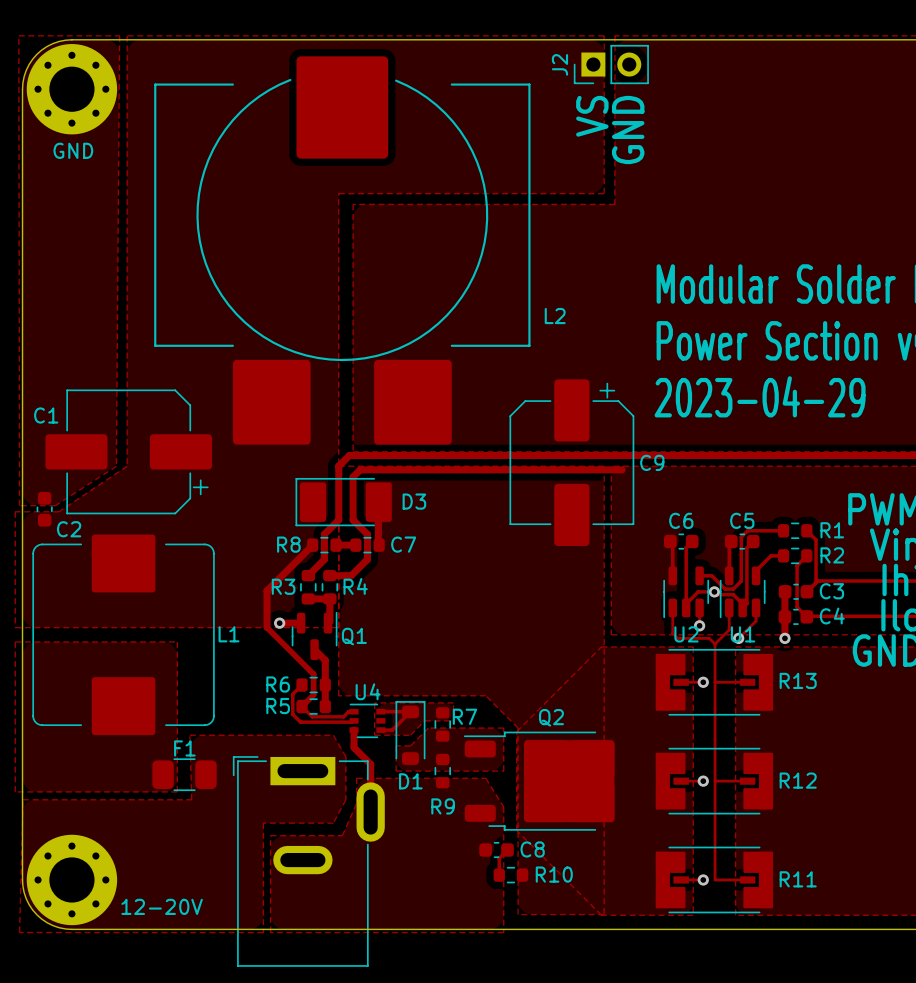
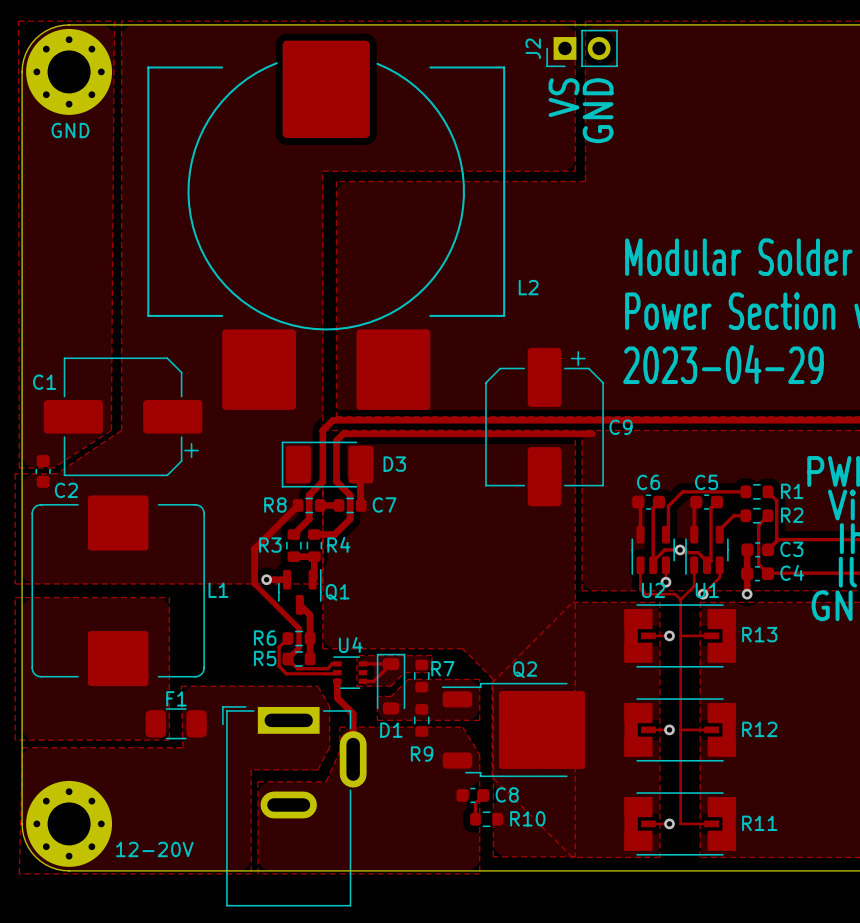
track: (747, 530) (741, 537) (741, 581) (733, 589) (725, 589) (711, 575) (699, 575) -> (711, 491) (682, 491) (668, 506) (668, 532) (665, 534)

